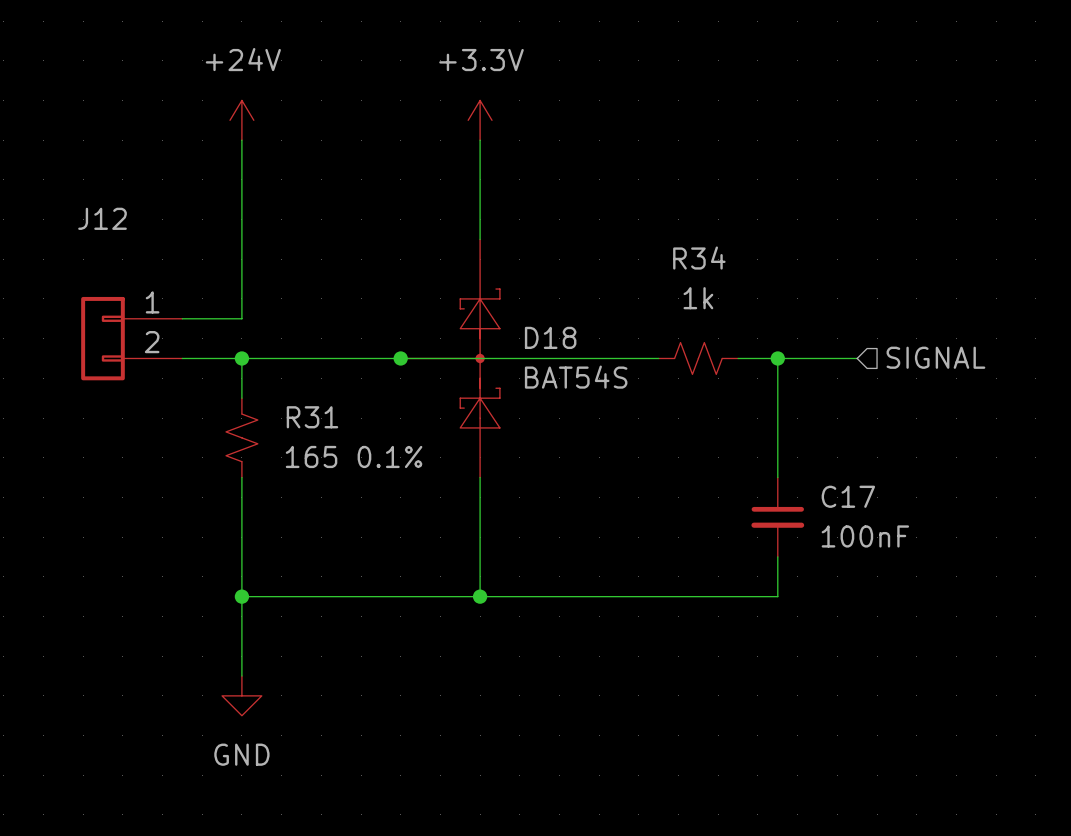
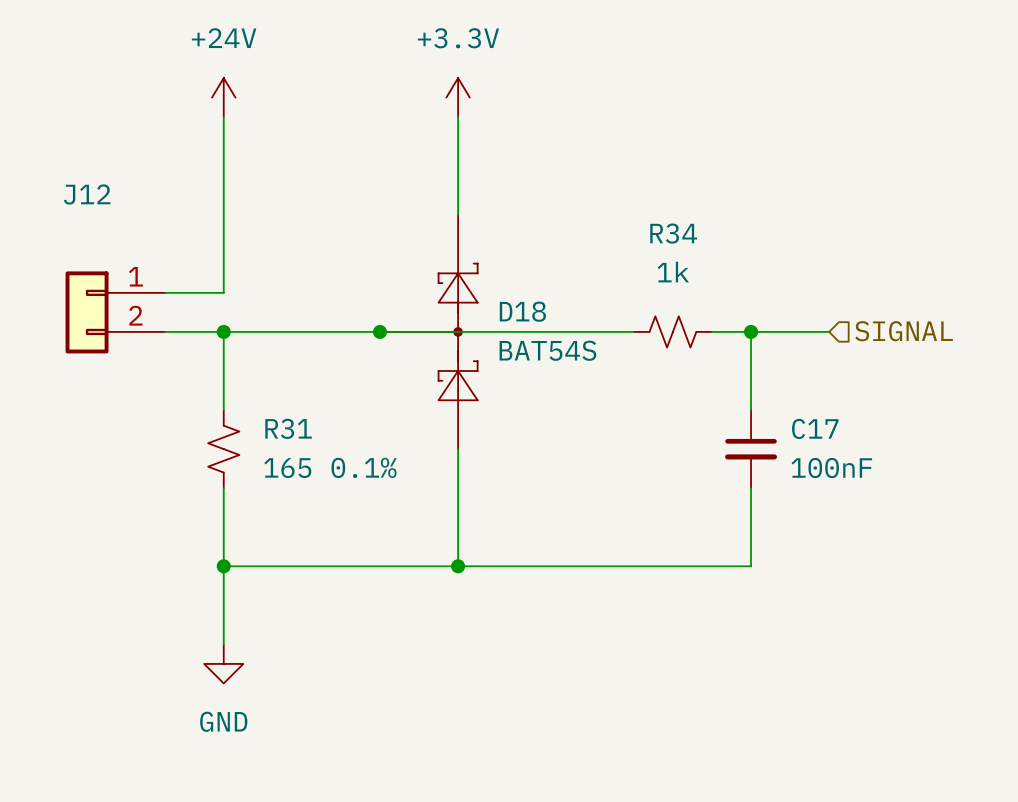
R31 position: (241, 437) -> (223, 449)
wire: (241, 477) (241, 517) -> (223, 371) (223, 410)
C17 position: (777, 517) -> (751, 449)

